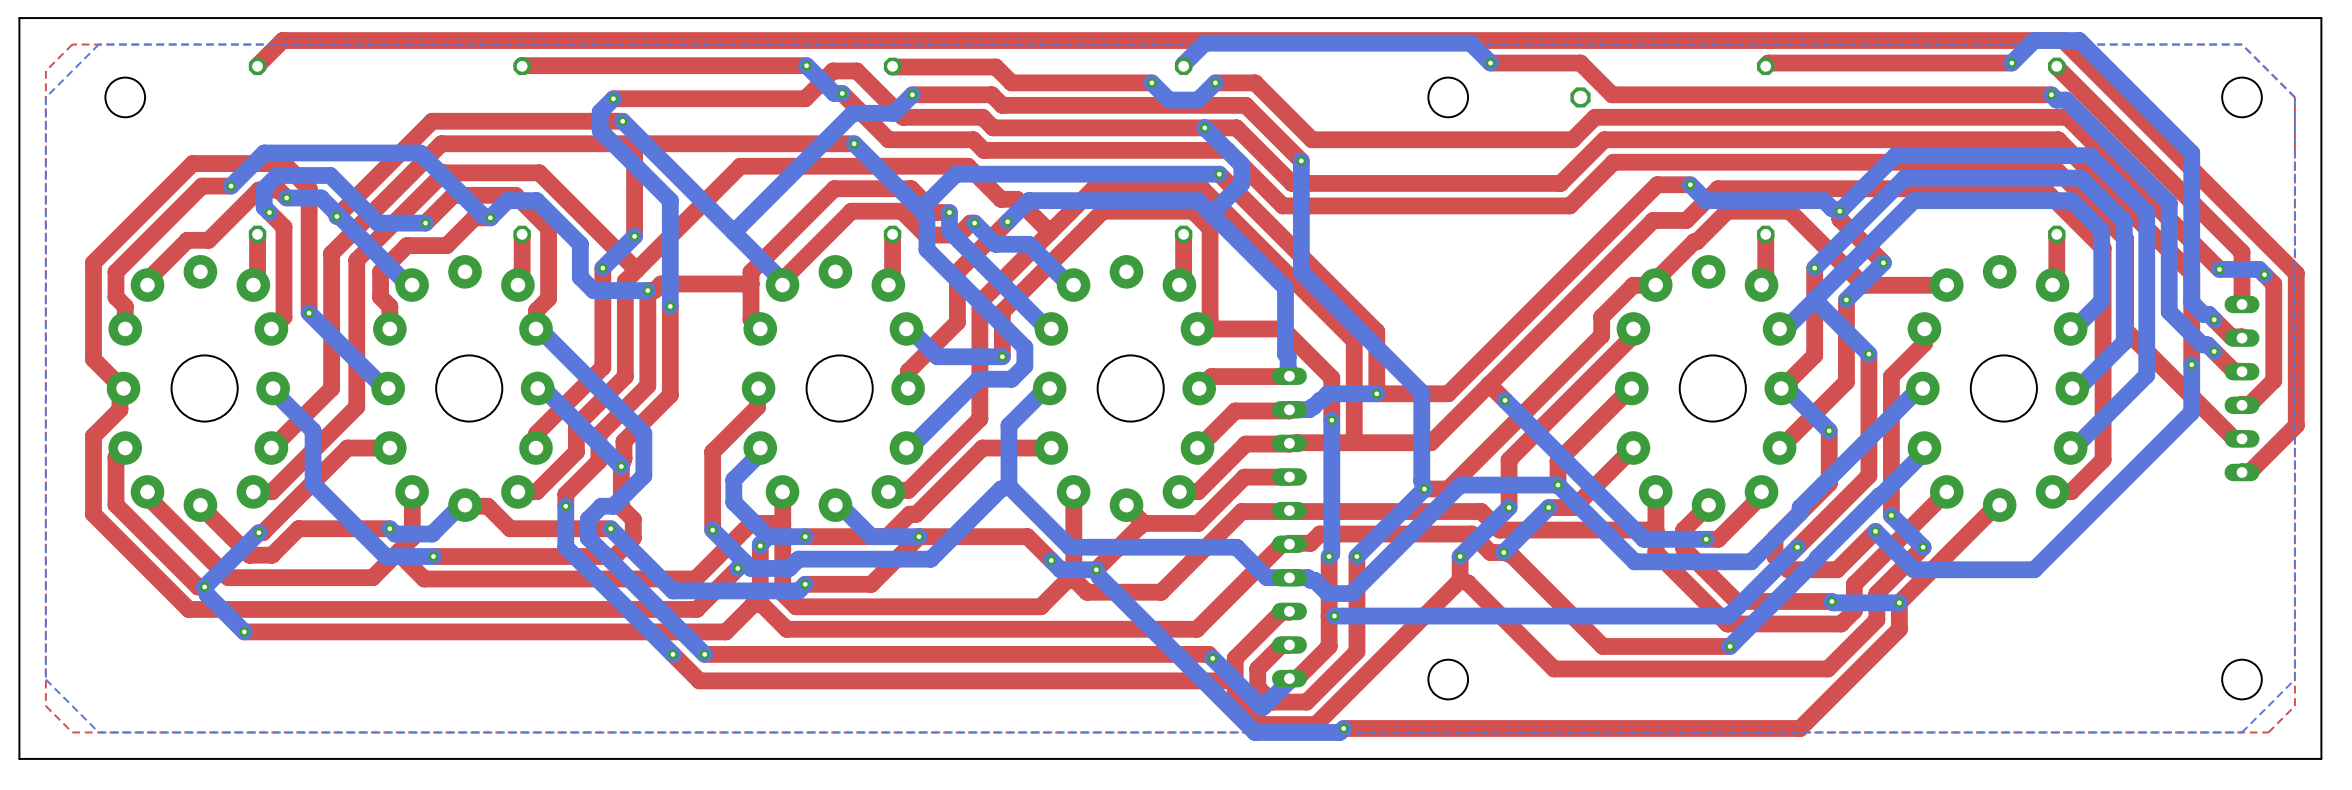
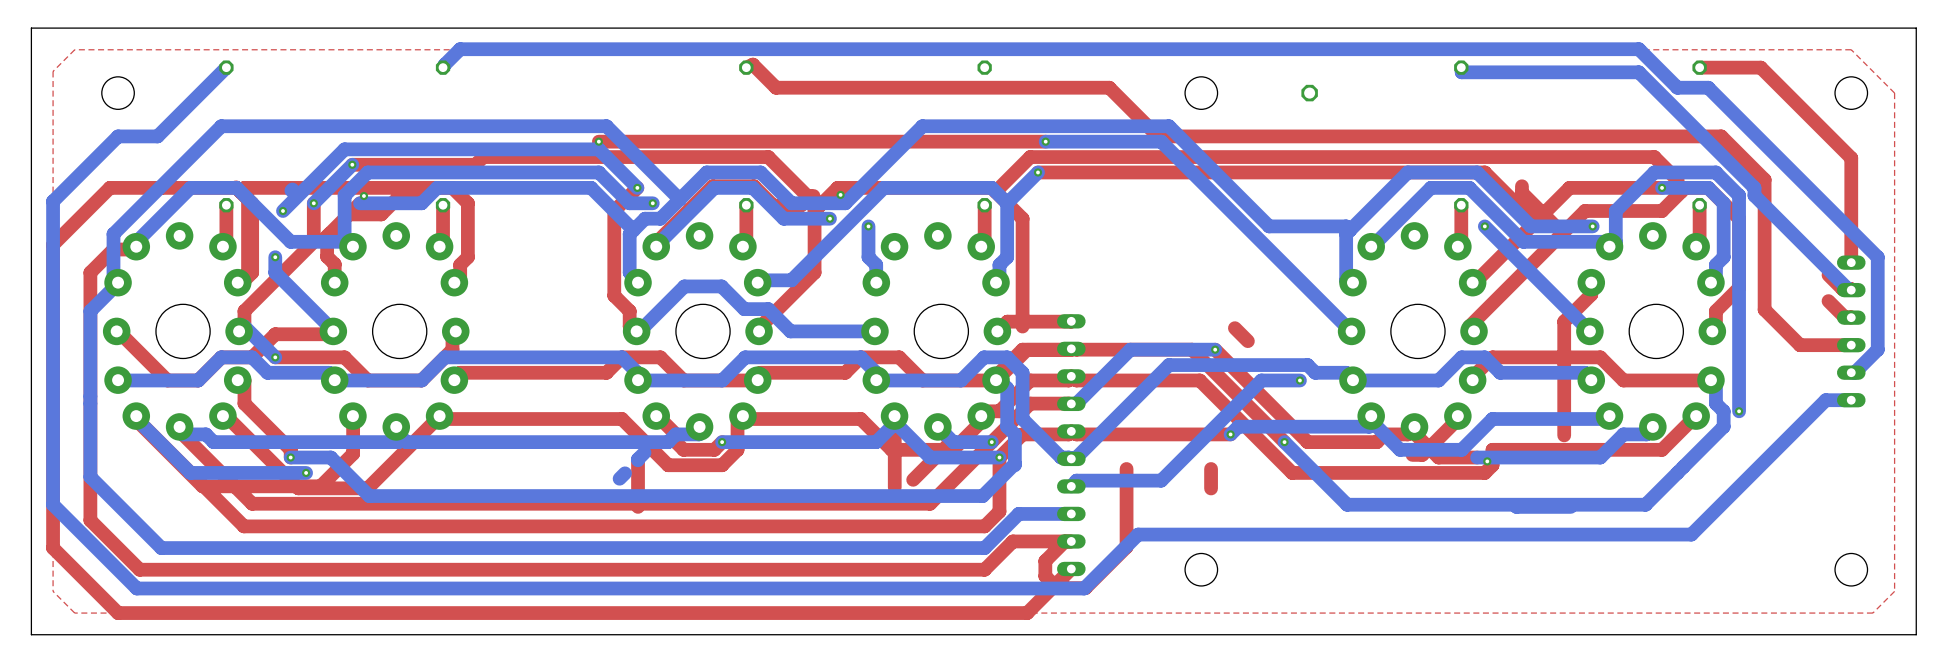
bottom zone outline: (2242, 44) (2294, 97) (2294, 679) (2242, 732) (98, 732) (45, 679) (45, 97) (98, 44) (2242, 44) -> none
top track: (1490, 63) (1580, 63) (1612, 94) (2051, 94) -> none
bottom track: (1490, 63) (1470, 43) (1204, 43) (1183, 66) -> none
via: (1490, 63) -> none
top track: (2011, 63) (1768, 63) (1765, 66) -> none
bottom track: (2011, 63) (2034, 40) (2079, 40) (2191, 153) (2191, 302) (2203, 314) (2208, 314) (2214, 319) -> none
via: (2011, 63) -> none
top track: (806, 65) (522, 66) -> none
bottom track: (806, 65) (834, 93) (842, 93) -> none
via: (806, 65) -> none
top track: (257, 66) (282, 40) (2063, 40) (2296, 273) (2296, 425) (2249, 471) (2242, 472) -> none
bottom track: none -> (226, 67) (157, 136) (118, 136) (53, 201) (53, 504) (136, 588) (1084, 588) (1138, 534) (1691, 534) (1825, 400) (1851, 400)
bottom track: none -> (443, 67) (460, 49) (1638, 49) (1677, 87) (1708, 87) (1877, 257) (1877, 349) (1854, 372) (1851, 372)
top track: (892, 66) (995, 67) (1011, 82) (1151, 82) -> (746, 67) (752, 64) (776, 87) (1109, 87) (1157, 136) (1721, 136) (1764, 179) (1764, 309) (1800, 345) (1851, 345)
bottom track: none -> (1461, 67) (1461, 72) (1638, 72) (1754, 187) (1754, 195) (1846, 288) (1851, 290)
top track: (2056, 66) (2242, 252) -> (1699, 67) (1760, 67) (1851, 158) (1851, 219)
via: (1151, 82) -> none
top track: (1215, 82) (1255, 82) (1311, 139) (1572, 139) (1595, 117) (2067, 117) (2219, 269) -> none
bottom track: (1215, 82) (1198, 100) (1169, 100) (1151, 82) -> none
via: (1215, 82) -> none
top track: (842, 93) (888, 139) (973, 139) (983, 150) (1227, 150) (1282, 205) (1569, 205) (1613, 162) (2048, 162) (2125, 239) (2125, 330) (2234, 438) (2242, 438) -> none
via: (842, 93) -> none
top track: (912, 94) (991, 94) (1002, 105) (1245, 105) (1301, 160) -> none
bottom track: (912, 94) (893, 113) (852, 113) (733, 232) -> none
via: (912, 94) -> none
bottom track: (2051, 94) (2056, 100) (2066, 100) (2169, 203) (2169, 311) (2202, 344) (2207, 344) (2214, 351) -> none
via: (2051, 94) -> none
top track: (613, 98) (805, 98) (833, 70) (856, 70) (903, 117) (982, 117) (993, 127) (1236, 127) (1292, 183) (1560, 183) (1604, 139) (2058, 139) (2191, 273) (2191, 364) -> none
bottom track: (613, 98) (600, 111) (600, 130) (670, 200) (670, 306) -> none
via: (613, 98) -> none
top track: (622, 121) (432, 121) (336, 216) -> none
bottom track: (622, 121) (781, 280) (782, 285) -> (829, 218) (783, 218) (752, 187) (714, 187) (656, 246)
via: (622, 121) -> none
bottom track: (1204, 127) (1241, 164) (1241, 183) (1211, 213) -> none
via: (1204, 127) -> none
top track: (634, 143) (634, 236) -> none
top track: (854, 143) (441, 143) (331, 253) (331, 388) (271, 448) -> (290, 457) (290, 449) (244, 403) (244, 380) (237, 380)
bottom track: (854, 143) (926, 216) (926, 249) (1024, 347) (1024, 366) (1011, 379) (978, 379) (909, 448) (906, 448) -> none
via: (854, 143) -> none
via: none -> (598, 141)
top track: none -> (1045, 141) (598, 141)
bottom track: none -> (1045, 141) (1161, 141) (1351, 331)
via: none -> (1045, 141)
bottom track: (1301, 160) (1301, 272) (1421, 392) (1421, 481) (1424, 489) (1356, 556) -> none
via: (1301, 160) -> none
top track: (1219, 174) (1376, 331) (1376, 393) (1448, 393) (1657, 184) (1690, 184) -> none
bottom track: (1219, 174) (956, 174) (920, 209) -> none
via: (1219, 174) -> none
top track: none -> (352, 164) (475, 164) (483, 157) (768, 157) (818, 207)
bottom track: none -> (352, 164) (313, 203)
via: none -> (352, 164)
bottom track: (1690, 184) (1706, 200) (1823, 200) (1831, 208) (1839, 211) (1895, 155) (2089, 155) (2146, 212) (2146, 375) (2073, 448) (2070, 448) -> (1284, 442) (1347, 504) (1645, 504) (1723, 426) (1723, 411) (1715, 403) (1715, 380) (1710, 380)
via: (1690, 184) -> none
top track: (231, 186) (201, 186) (115, 272) (115, 297) (125, 306) (125, 328) -> none
bottom track: (231, 186) (264, 153) (420, 153) (482, 215) (490, 217) (507, 200) (536, 200) (580, 244) (580, 277) (593, 290) (647, 290) -> none
via: (231, 186) -> none
top track: none -> (1037, 172) (1484, 172) (1534, 222)
bottom track: none -> (1037, 172) (1007, 203)
via: none -> (1037, 172)
top track: (286, 197) (278, 190) (258, 190) (208, 240) (187, 240) (147, 280) (147, 285) -> (1071, 541) (1012, 541) (984, 569) (139, 569) (90, 520) (90, 272) (113, 249) (128, 249) (136, 246)
bottom track: (286, 197) (321, 197) (407, 283) (412, 285) -> none
via: (286, 197) -> none
via: (1839, 211) -> none
bottom track: (269, 212) (264, 207) (264, 188) (277, 175) (330, 175) (377, 223) (425, 223) -> none
via: (269, 212) -> none
top track: (949, 212) (934, 212) (911, 188) (834, 188) (751, 272) (751, 319) (760, 328) -> none
bottom track: (949, 212) (949, 231) (1047, 328) (1051, 328) -> (868, 226) (868, 257) (876, 264) (876, 282)
via: (949, 212) -> none
bottom track: none -> (637, 187) (598, 149) (344, 149) (282, 210)
via: none -> (637, 187)
top track: none -> (1662, 187) (1569, 187) (1472, 282)
via: none -> (1662, 187)
via: (336, 216) -> none
via: (490, 217) -> none
top track: none -> (1681, 191) (1677, 187) (1677, 180) (1654, 157) (1030, 157) (995, 191)
top track: (1007, 221) (957, 272) (957, 322) (908, 371) (908, 388) -> (1022, 326) (1022, 218) (991, 187) (837, 187) (814, 210) (814, 272) (760, 326) (759, 331)
bottom track: (1007, 221) (1028, 200) (1198, 200) (1285, 287) (1285, 354) (1288, 356) (1289, 376) -> none
top track: (425, 223) (453, 195) (515, 195) (548, 228) (548, 298) (536, 310) (536, 328) -> (240, 191) (244, 187) (452, 187) (467, 203) (467, 257) (460, 264) (460, 280) (454, 282)
bottom track: (974, 223) (995, 244) (1028, 244) (1068, 283) (1073, 285) -> none
via: (974, 223) -> none
bottom track: none -> (679, 199) (606, 126) (221, 126) (113, 234) (113, 280) (118, 282) (90, 311) (90, 477) (161, 548) (984, 548) (1018, 513) (1071, 513)
top track: none -> (313, 203) (313, 241) (244, 311) (244, 326) (239, 331)
via: none -> (313, 203)
bottom track: none -> (360, 203) (421, 203) (437, 187) (591, 187) (633, 230)
bottom track: none -> (652, 203) (629, 203) (598, 172) (367, 172) (344, 195) (344, 241) (352, 246) (352, 241) (290, 241) (236, 187) (190, 187) (136, 241) (136, 246)
via: none -> (652, 203)
top track: (1050, 232) (1016, 199) (1001, 199) (967, 166) (740, 166) (625, 281) (625, 376) (576, 425) (576, 451) (536, 491) (517, 491) -> none
bottom track: none -> (1007, 203) (1007, 257) (999, 264) (999, 280) (996, 282)
bottom track: (634, 236) (602, 268) -> none
via: (634, 236) -> none
via: none -> (282, 210)
via: none -> (829, 218)
via: none -> (868, 226)
bottom track: none -> (1484, 226) (1589, 331)
bottom track: none -> (1592, 226) (1531, 226) (1477, 172) (1407, 172) (1346, 234) (1346, 280) (1352, 282)
bottom track: (1883, 262) (1846, 299) -> none
via position: (1883, 262) -> (1592, 226)
bottom track: none -> (1350, 230) (1346, 226) (1269, 226) (1168, 126) (922, 126) (845, 203) (791, 203) (760, 172) (706, 172) (660, 218) (645, 218) (629, 234) (629, 272) (638, 282)
top track: (602, 268) (602, 367) (536, 433) (536, 448) -> (1284, 442) (1192, 349) (1022, 349) (999, 372) (996, 380) (991, 380) (922, 380) (899, 357) (860, 357) (845, 372) (760, 372) (757, 380) (752, 380) (683, 380) (660, 357) (621, 357) (606, 372) (460, 372) (454, 380)
via: (602, 268) -> none
top track: (1814, 268) (1814, 355) (1781, 388) -> (1712, 331) (1715, 326) (1715, 311) (1739, 288) (1739, 218) (1708, 187) (1685, 187) (1662, 210) (1584, 210) (1469, 326) (1474, 331)
bottom track: (1814, 268) (1904, 178) (2080, 178) (2124, 221) (2124, 342) (2077, 388) (2072, 388) -> none
via position: (1814, 268) -> (1484, 226)
bottom track: (2219, 269) (2259, 269) (2264, 274) -> none
via: (2219, 269) -> none
top track: (636, 270) (539, 172) (444, 172) (356, 260) (356, 407) (272, 491) (253, 491) -> (737, 419) (737, 449) (722, 465) (668, 465) (621, 419) (444, 419) (439, 416) (367, 488) (298, 488) (229, 419) (222, 416)
top track: (2264, 274) (2273, 283) (2273, 380) (2249, 404) (2242, 405) -> none
via: (2264, 274) -> none
top track: (751, 283) (661, 283) (654, 290) (647, 290) (647, 385) (598, 434) (598, 461) (565, 494) (565, 506) -> none
bottom track: none -> (1371, 246) (1430, 187) (1469, 187) (1523, 241) (1608, 241) (1609, 246) (1615, 241) (1615, 210) (1654, 172) (1715, 172) (1739, 195) (1739, 411)
top track: (1946, 285) (1863, 285) (1789, 211) (1727, 211) (1658, 277) (1655, 285) (1633, 285) (1601, 317) (1601, 335) (1448, 489) (1424, 489) -> none
via: (647, 290) -> none
bottom track: (1814, 299) (1868, 354) -> none
top track: (1846, 299) (1846, 381) (1779, 448) -> (1710, 380) (1623, 380) (1600, 357) (1492, 357) (1472, 380)
via: (1846, 299) -> none
top track: (670, 306) (670, 395) (624, 441) (624, 458) (621, 466) (621, 507) (633, 519) (633, 537) (614, 556) (433, 556) -> none
via: (670, 306) -> none
top track: (309, 313) (309, 188) (284, 163) (192, 163) (93, 262) (93, 359) (123, 388) (119, 396) (119, 409) (93, 436) (93, 514) (188, 609) (696, 609) (737, 568) -> none
bottom track: (309, 313) (384, 388) (388, 388) -> (275, 257) (275, 272) (333, 331)
via position: (309, 313) -> (275, 257)
via: (2214, 319) -> none
bottom track: (536, 328) (539, 328) (643, 433) (643, 475) (613, 506) (601, 506) (588, 519) (588, 537) (704, 654) -> none
bottom track: (906, 328) (909, 328) (937, 356) (1002, 356) -> (757, 282) (760, 280) (791, 280) (883, 187) (991, 187) (1007, 203)
top track: (1633, 328) (1633, 335) (1509, 459) (1509, 507) -> none
bottom track: (2070, 328) (2073, 328) (2101, 301) (2101, 231) (2071, 200) (1913, 200) (1785, 328) (1779, 328) -> (1710, 282) (1715, 280) (1715, 264) (1723, 257) (1723, 203) (1708, 187) (1662, 187)
via: (2214, 351) -> none
top track: (1868, 354) (1868, 475) (1797, 547) -> none
via: (1868, 354) -> none
top track: (1002, 356) (1002, 311) (1102, 211) (1192, 211) (1210, 228) (1210, 321) (1197, 328) (1282, 328) (1331, 377) (1331, 420) -> none
via: (1002, 356) -> none
bottom track: (2191, 364) (2191, 412) (2034, 569) (1913, 569) (1875, 531) -> none
via: (2191, 364) -> none
bottom track: (273, 388) (273, 391) (313, 430) (313, 483) (385, 556) (433, 556) -> (239, 331) (244, 326) (275, 357)
top track: none -> (333, 331) (329, 334) (275, 334) (252, 357) (221, 357) (198, 380) (167, 380) (116, 331)
top track: none -> (455, 331) (452, 334) (452, 349) (421, 380) (367, 380) (344, 357) (275, 357)
bottom track: (537, 388) (543, 388) (621, 466) -> none
top track: (758, 388) (757, 407) (712, 451) (712, 530) -> (636, 331) (629, 326) (629, 311) (614, 295) (614, 210) (637, 187)
bottom track: (1046, 388) (1008, 425) (1008, 486) -> (872, 331) (790, 331) (768, 309) (744, 309) (721, 286) (684, 286) (639, 331) (636, 331)
top track: (1631, 388) (1558, 461) (1558, 485) -> none
bottom track: (1781, 388) (1786, 388) (1829, 430) -> none
bottom track: (1922, 388) (1919, 388) (1800, 507) (1800, 512) (1751, 561) (1634, 561) (1558, 485) (1460, 485) (1351, 593) (1327, 593) (1314, 580) (1307, 577) (1289, 577) -> (1299, 380) (1261, 380) (1161, 480) (1076, 480) (1071, 486)
bottom track: (1376, 393) (1327, 393) (1309, 409) (1289, 409) -> none
via: (1376, 393) -> none
bottom track: (1505, 400) (1644, 539) (1706, 539) -> none
via: (1505, 400) -> none
top track: none -> (1215, 349) (1307, 442) (1376, 442) (1384, 434) (1407, 434) (1414, 426) (1415, 434) (1438, 457) (1477, 457)
bottom track: none -> (1215, 349) (1130, 349) (1076, 403) (1071, 403)
via: none -> (1215, 349)
via: none -> (275, 357)
bottom track: (1331, 420) (1331, 553) (1329, 556) -> none
via: (1331, 420) -> none
top track: (1829, 430) (1829, 483) (1774, 537) (1774, 556) (1788, 569) (1837, 569) (1875, 531) -> none
via: (1829, 430) -> none
top track: (1354, 442) (1354, 340) (1202, 188) (1093, 188) (979, 302) (979, 418) (908, 490) (888, 491) -> none
top track: (125, 448) (115, 457) (115, 504) (198, 586) (204, 586) -> none
top track: (389, 448) (347, 448) (262, 532) (258, 532) -> none
bottom track: (760, 448) (760, 453) (733, 479) (733, 502) (768, 536) (805, 536) -> none
top track: (1051, 448) (982, 448) (916, 514) (909, 514) (887, 536) (805, 536) -> none
bottom track: none -> (996, 380) (999, 380) (1007, 388) (1007, 426) (1014, 434) (1014, 465)
via: none -> (1299, 380)
top track: (1633, 448) (1573, 507) (1548, 507) -> none
bottom track: (1924, 448) (1924, 451) (1730, 646) -> (1591, 380) (1584, 372) (1500, 372) (1484, 357) (1461, 357) (1438, 380) (1353, 380) (1346, 372) (1315, 372) (1307, 365) (1168, 365) (1076, 457) (1071, 458) (1061, 457) (1022, 419) (1022, 372) (1007, 357) (984, 357) (960, 380) (876, 380) (876, 372) (860, 357) (745, 357) (722, 380) (638, 380) (637, 372) (621, 357) (444, 357) (421, 380) (336, 380) (329, 372) (267, 372) (252, 357) (221, 357) (198, 380) (118, 380)
via: (621, 466) -> none
top track: (1289, 477) (1244, 477) (1198, 523) (1143, 523) -> none
via: (1558, 485) -> none
bottom track: (1008, 486) (1069, 547) (1236, 547) (1266, 577) (1289, 577) -> none
bottom track: (1008, 486) (1001, 489) (930, 559) (798, 559) (789, 568) (751, 568) (712, 530) -> none
via: none -> (1739, 411)
via: (1424, 489) -> none
top track: none -> (136, 416) (136, 419) (244, 526) (984, 526) (999, 511) (999, 457) (1022, 434) (1068, 434) (1071, 431) (1076, 434) (1230, 434)
bottom track: none -> (136, 416) (136, 419) (190, 472) (306, 472)
top track: (782, 491) (782, 593) (795, 606) (1040, 606) (1065, 581) (1073, 579) (1087, 592) (1161, 592) (1241, 511) (1481, 511) (1499, 530) (1655, 530) -> (656, 416) (675, 434) (675, 442) (683, 449) (714, 449) (722, 442)
top track: (1946, 491) (1854, 584) (1854, 610) (1841, 623) (1727, 623) (1655, 552) (1655, 491) -> none
bottom track: none -> (1609, 416) (1608, 419) (1492, 419) (1461, 449) (1400, 449) (1369, 419) (1371, 416) (1369, 426) (1238, 426) (1230, 434)
top track: (2052, 491) (2071, 491) (2103, 459) (2103, 248) (2043, 188) (1718, 188) (1686, 220) (1653, 220) (1431, 442) (1245, 444) (1198, 491) (1179, 491) -> (1696, 416) (1662, 449) (1492, 449) (1492, 465) (1484, 472) (1292, 472) (1199, 380) (1076, 380) (1071, 376) (1068, 380) (1030, 380) (999, 411) (984, 411) (981, 416) (984, 419) (953, 449) (891, 449) (860, 419) (745, 419) (742, 416)
top track: (200, 505) (249, 555) (272, 555) (298, 528) (389, 528) -> (179, 426) (182, 434) (252, 503) (930, 503) (1030, 403) (1071, 403)
bottom track: none -> (179, 426) (182, 434) (205, 434) (213, 442) (398, 442) (402, 438)
top track: (465, 505) (487, 506) (510, 528) (610, 528) -> none
bottom track: (465, 505) (459, 506) (432, 534) (395, 534) (389, 528) -> (396, 426) (398, 434) (406, 442) (668, 442) (675, 434) (699, 434) (699, 426)
bottom track: (835, 505) (840, 506) (871, 536) (919, 536) -> none
bottom track: none -> (937, 426) (953, 442) (991, 442)
top track: (1708, 505) (1683, 530) (1683, 548) (1736, 601) (1831, 601) -> none
top track: (1999, 505) (1995, 506) (1899, 602) (1899, 629) (1800, 728) (1343, 728) -> none
bottom track: none -> (1652, 426) (1646, 434) (1623, 434) (1600, 457) (1477, 457)
bottom track: (565, 506) (565, 547) (672, 654) -> none
via: (565, 506) -> none
bottom track: (1509, 507) (1460, 556) -> none
via: (1509, 507) -> none
bottom track: (1548, 507) (1503, 552) -> none
via position: (1548, 507) -> (1284, 442)
via: none -> (1230, 434)
bottom track: (1891, 515) (1923, 547) -> none
via: (1891, 515) -> none
top track: (782, 523) (751, 523) (695, 579) (424, 579) (397, 552) -> none
bottom track: none -> (722, 442) (876, 442) (891, 426) (894, 416) (891, 419) (930, 457) (999, 457)
via: none -> (722, 442)
via: none -> (991, 442)
via: (389, 528) -> none
bottom track: (610, 528) (672, 590) (798, 590) (805, 584) -> none
via: (610, 528) -> none
via: (712, 530) -> none
via: (1875, 531) -> none
bottom track: (258, 532) (204, 586) (207, 594) (244, 631) -> none
via: (258, 532) -> none
via: (805, 536) -> none
via: (919, 536) -> none
via: (1706, 539) -> none
bottom track: none -> (290, 457) (330, 457) (369, 496) (982, 496) (1014, 463)
via: none -> (290, 457)
via: none -> (999, 457)
via: (760, 545) -> none
bottom track: (1797, 547) (1728, 616) (1334, 616) -> none
top track: (1923, 547) (1876, 593) (1876, 620) (1827, 668) (1554, 668) (1468, 582) (1460, 580) (1315, 724) (1263, 724) (1235, 696) (1235, 658) (1281, 612) (1289, 611) -> none
via: (1923, 547) -> none
via: (1503, 552) -> none
via: (433, 556) -> none
top track: (1329, 556) (1329, 646) (1297, 678) (1289, 678) -> (237, 282) (244, 280) (252, 272) (252, 203) (236, 187) (109, 187) (53, 244) (53, 548) (118, 613) (1027, 613) (1071, 568)
via: (1329, 556) -> none
via: (1356, 556) -> none
via: (1460, 556) -> none
top track: (1051, 560) (1027, 536) (919, 536) (871, 584) (805, 584) -> none
bottom track: (1051, 560) (1060, 569) (1096, 569) (1098, 576) (1255, 732) (1339, 732) (1343, 728) -> none
via: (1051, 560) -> none
via: none -> (306, 472)
via: (737, 568) -> none
via: (1096, 569) -> none
via: (805, 584) -> none
via: (204, 586) -> none
via: (1831, 601) -> none
via: (1899, 602) -> none
via: (1334, 616) -> none
top track: (244, 631) (725, 631) (752, 605) (760, 602) (786, 629) (1196, 629) (1281, 544) (1310, 543) (1319, 534) (1472, 534) (1490, 552) (1503, 552) (1511, 555) (1603, 646) (1730, 646) -> none
via: (244, 631) -> none
via: (1730, 646) -> none
top track: (672, 654) (699, 680) (1235, 680) -> none
via: (672, 654) -> none
top track: (704, 654) (1208, 654) (1212, 658) -> none
via: (704, 654) -> none
bottom track: (1212, 658) (1261, 707) (1289, 680) (1289, 678) -> none
via: (1212, 658) -> none
via: (1343, 728) -> none

